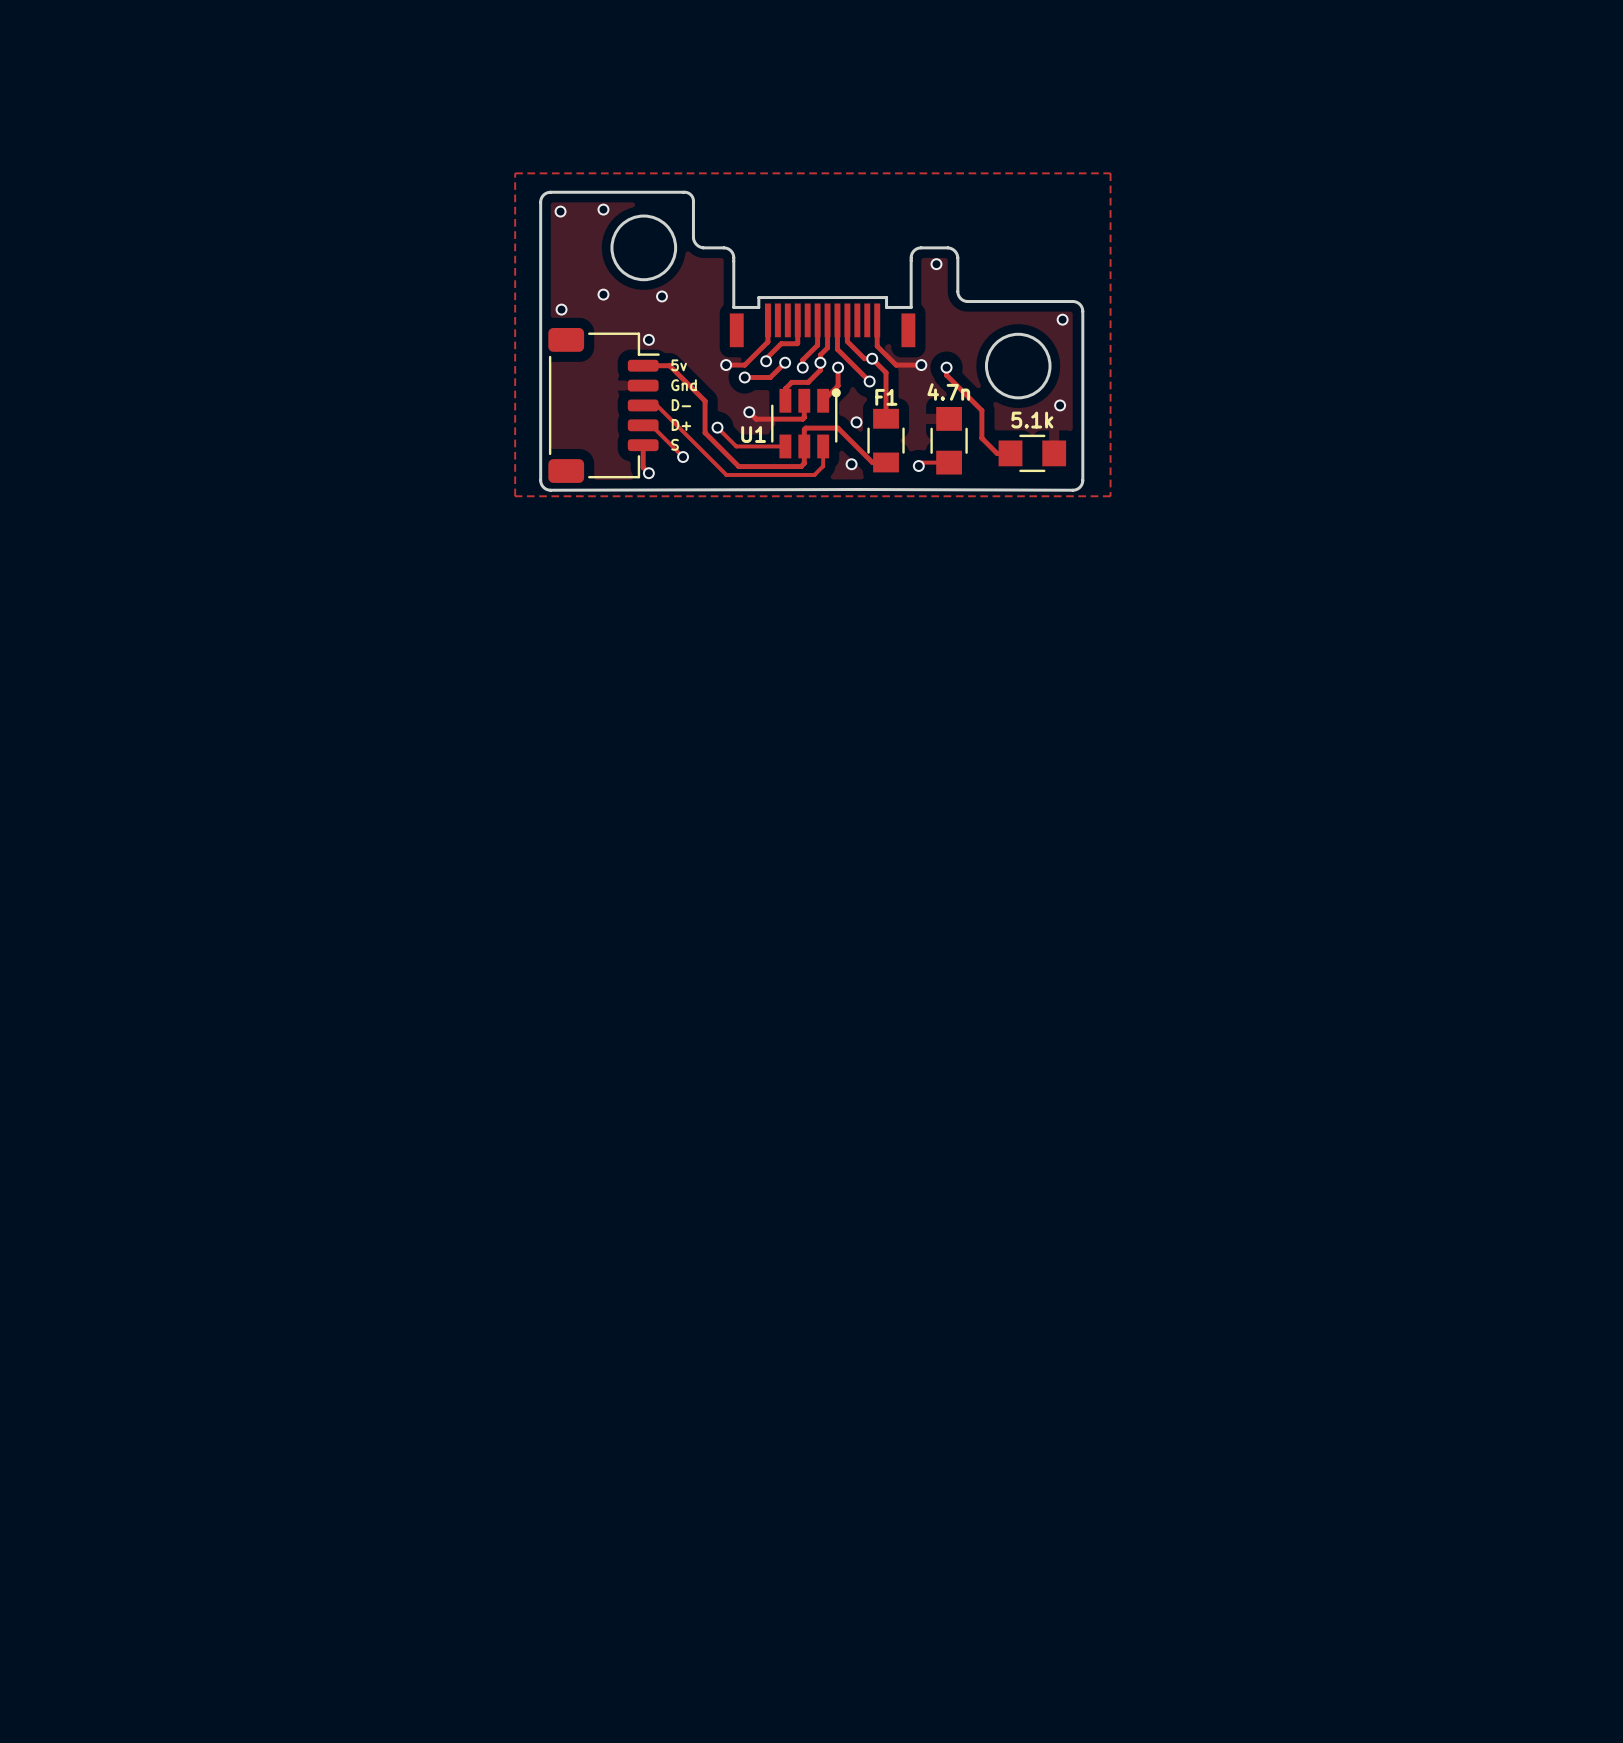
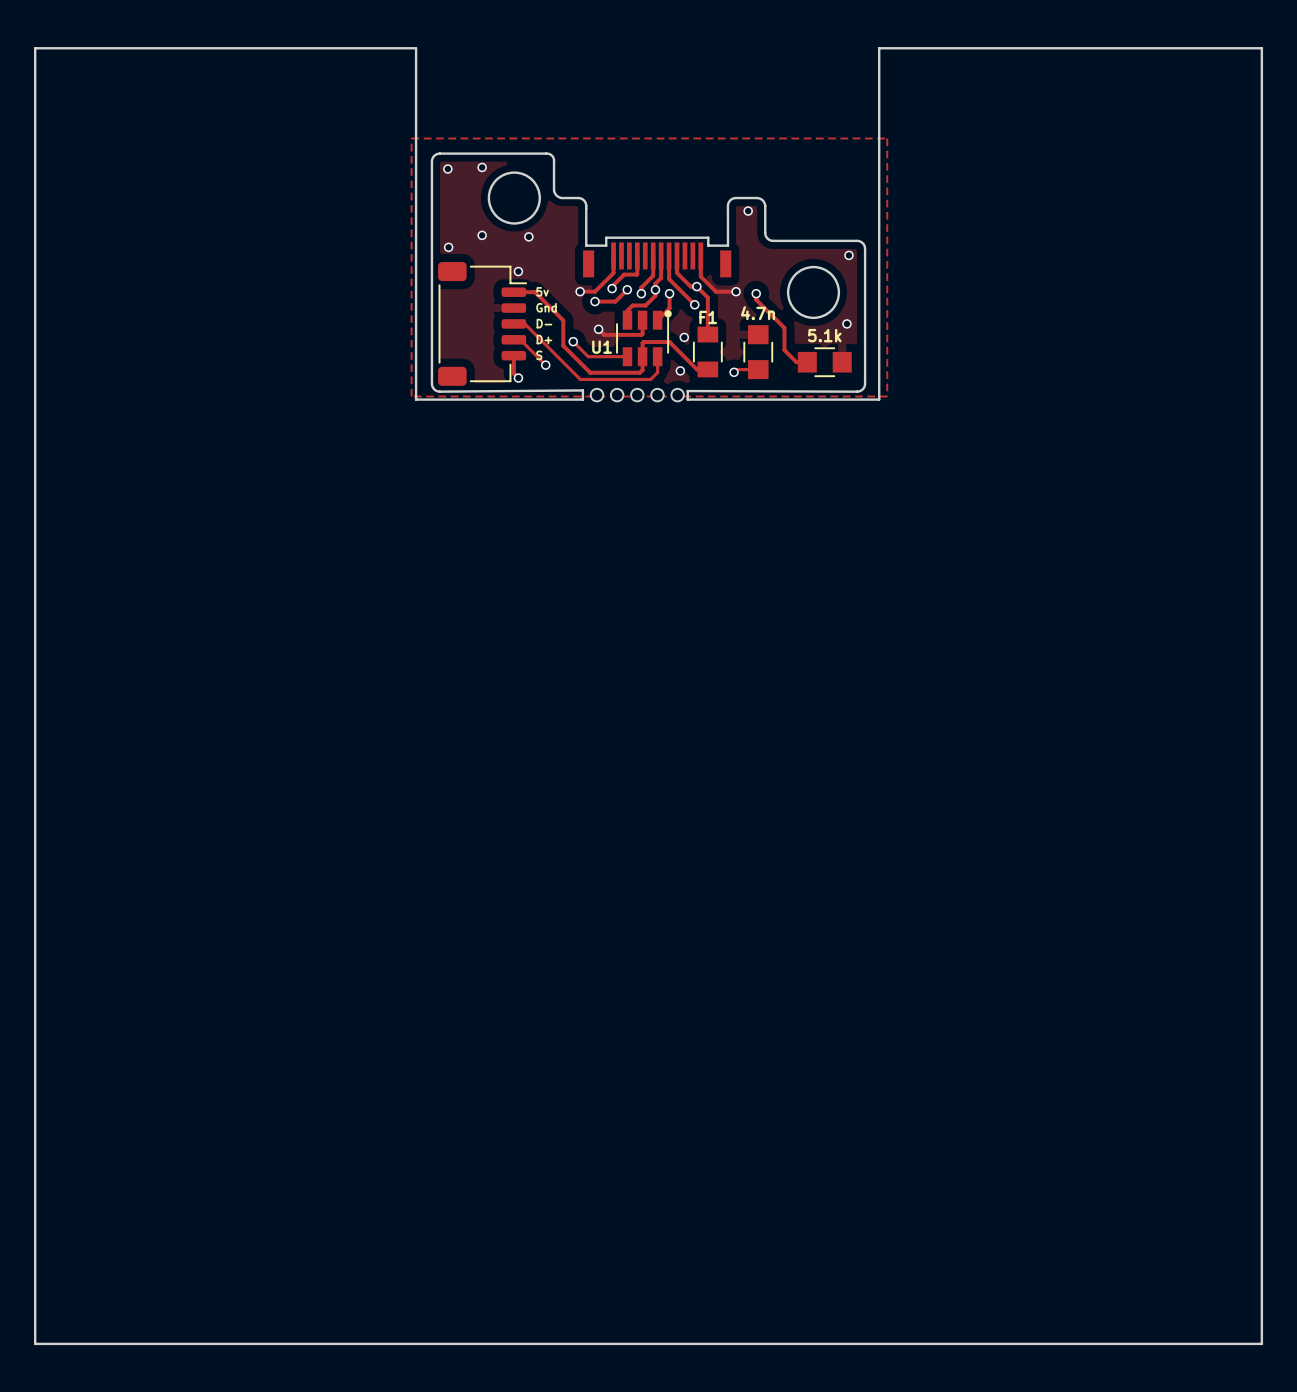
board edge: (860, 489) (550, 490) -> (687, 391) (687, 399) (879, 399) (879, 48) (1261, 48) (1261, 1343) (35, 1343) (35, 48) (416, 48) (416, 399) (582, 399) (582, 390) (439, 391)
part: none -> (637, 395)

